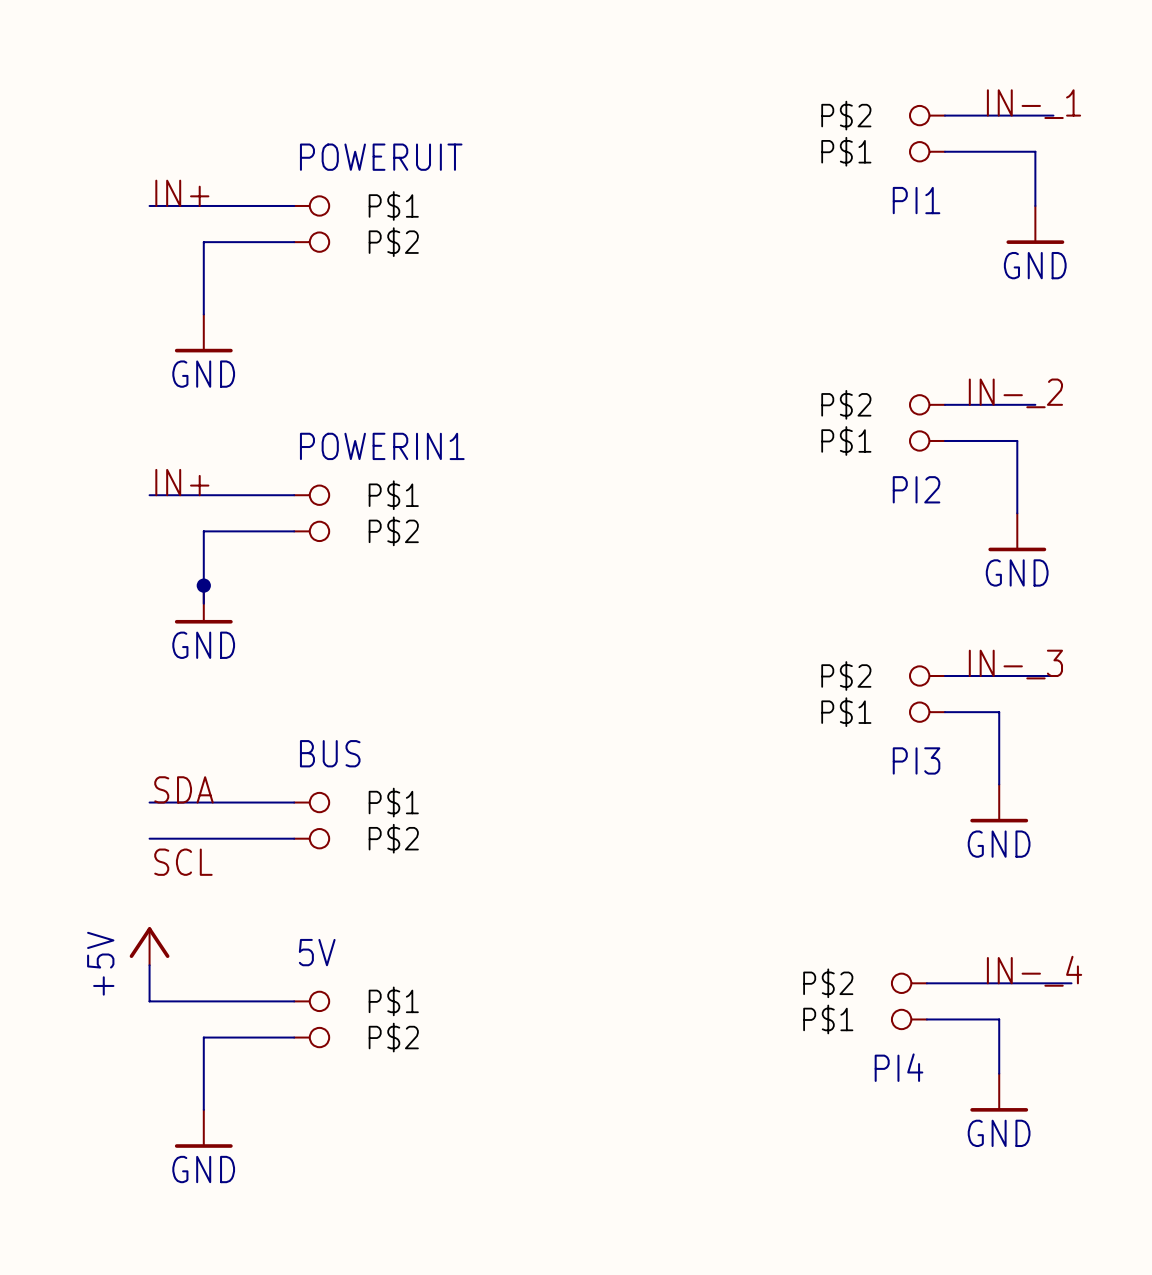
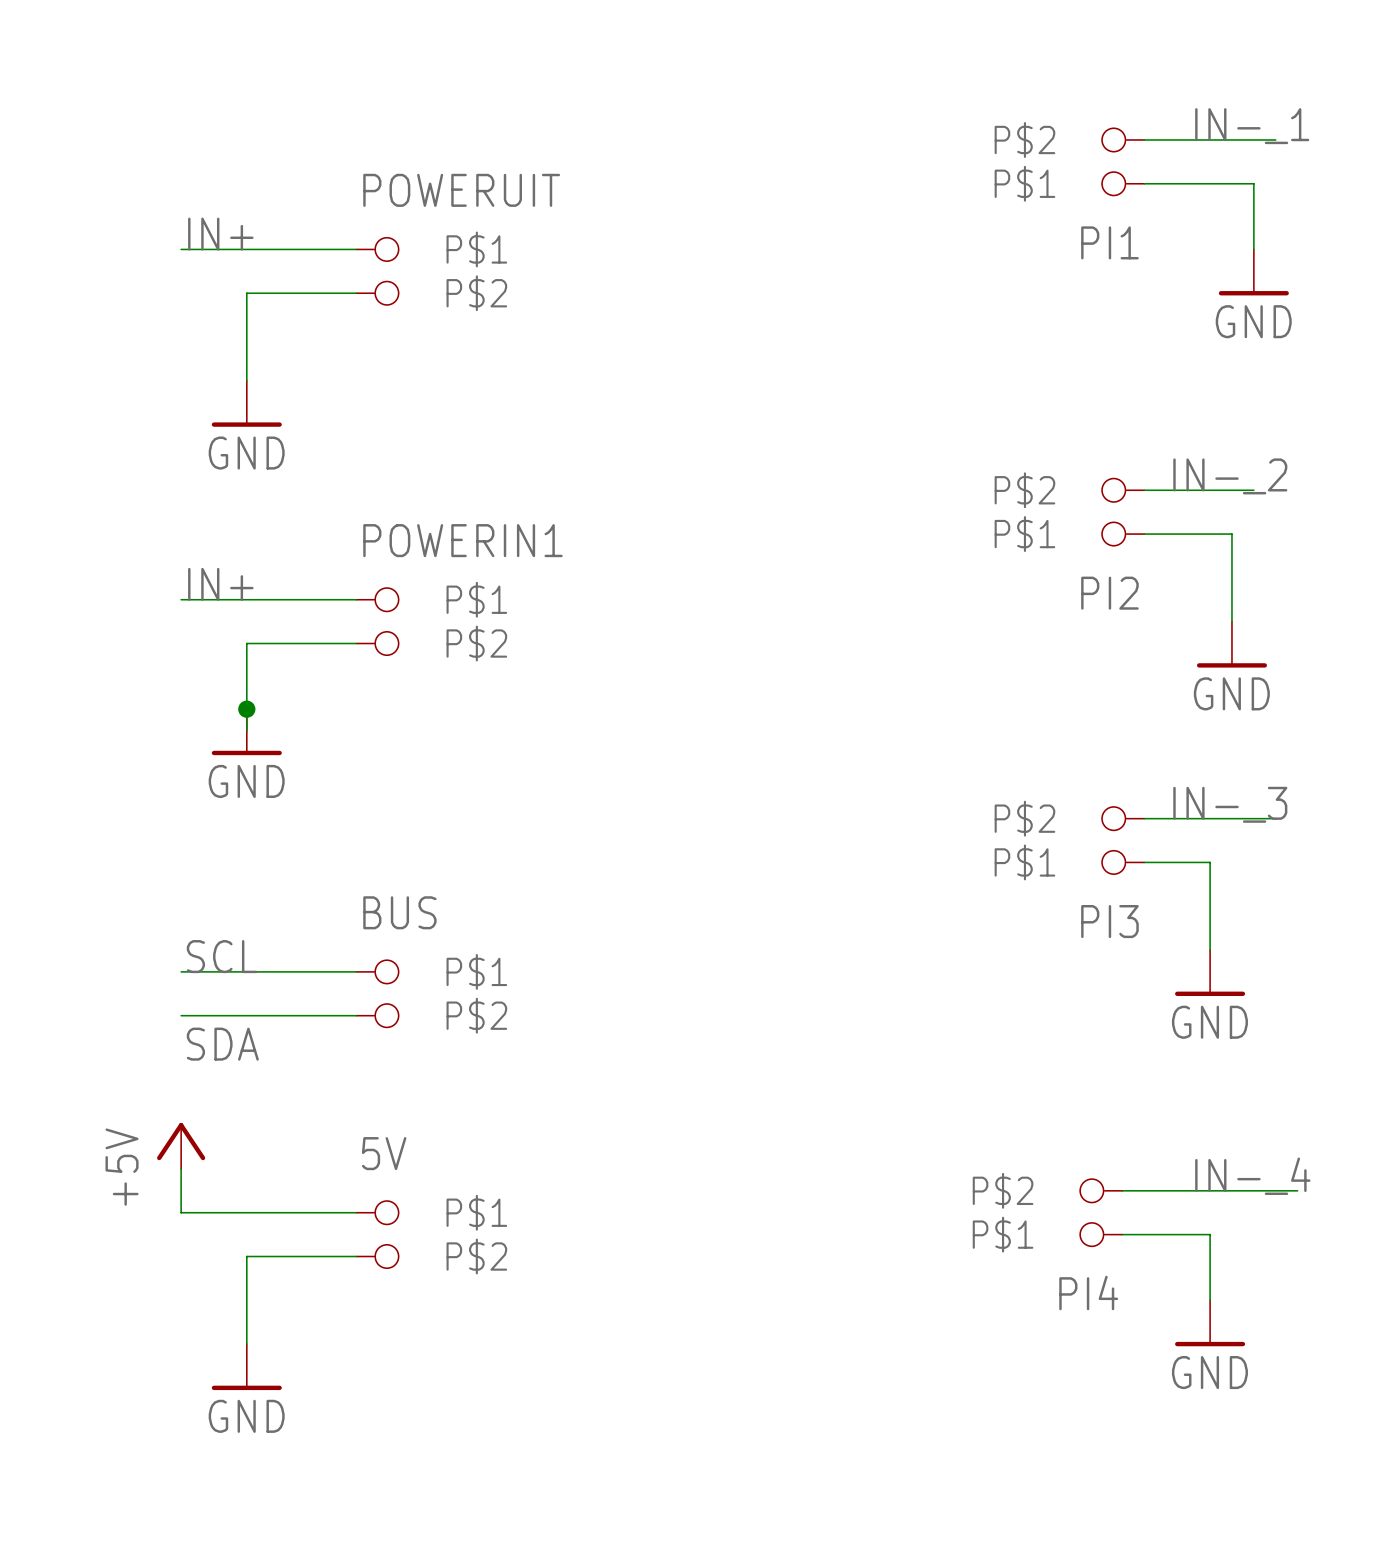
label: SDA (183, 789) -> SCL (222, 956)
label: SCL (183, 862) -> SDA (222, 1044)

